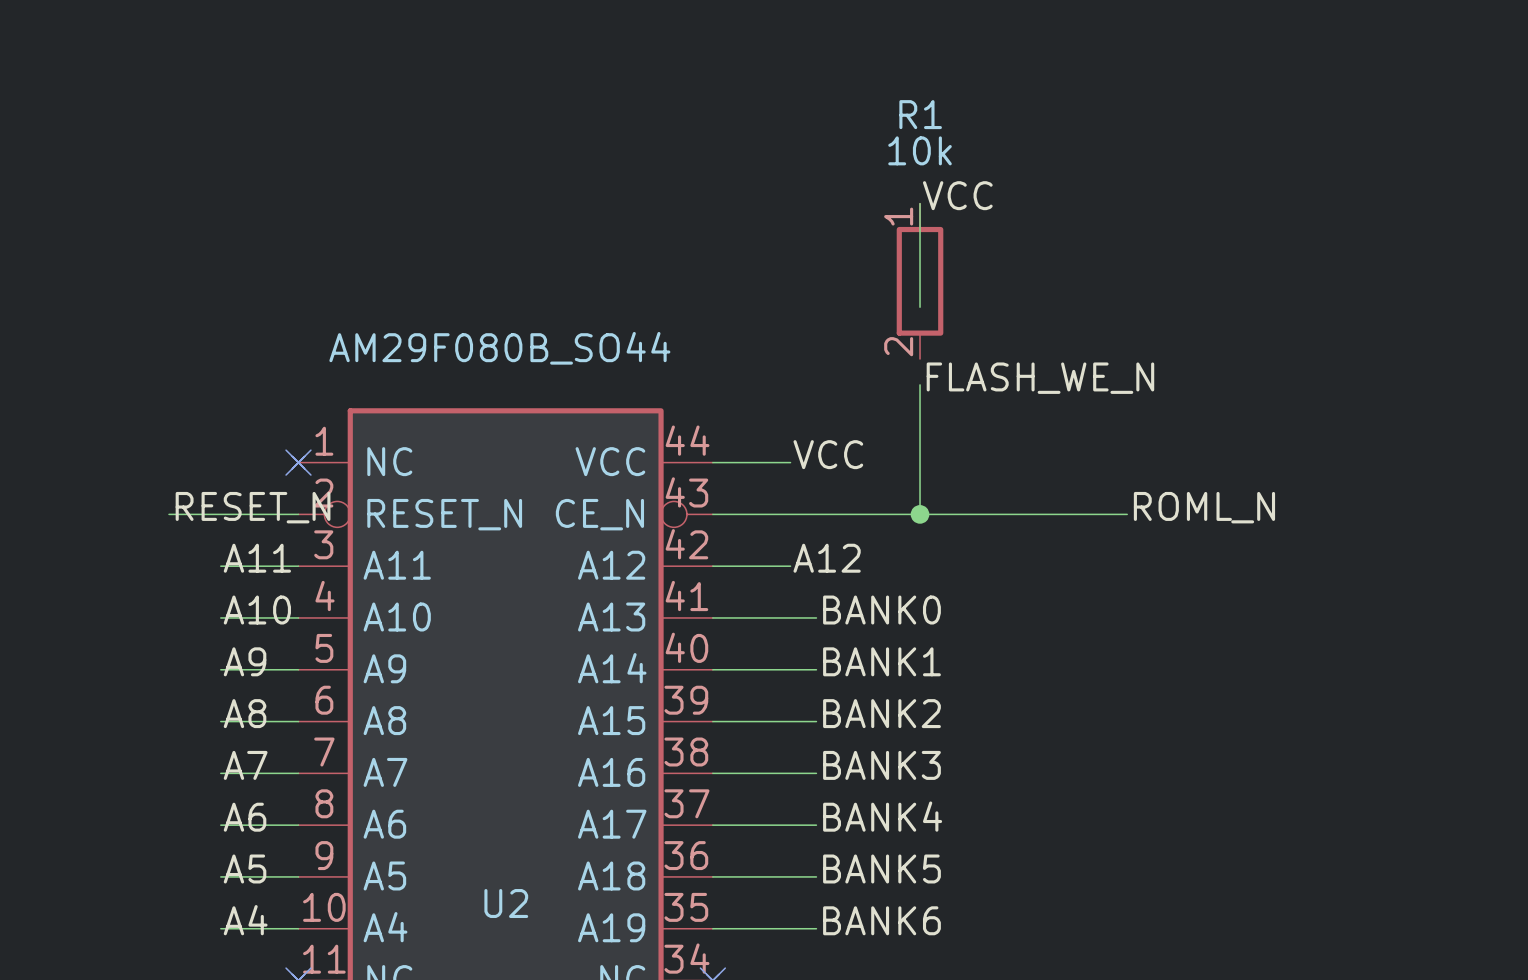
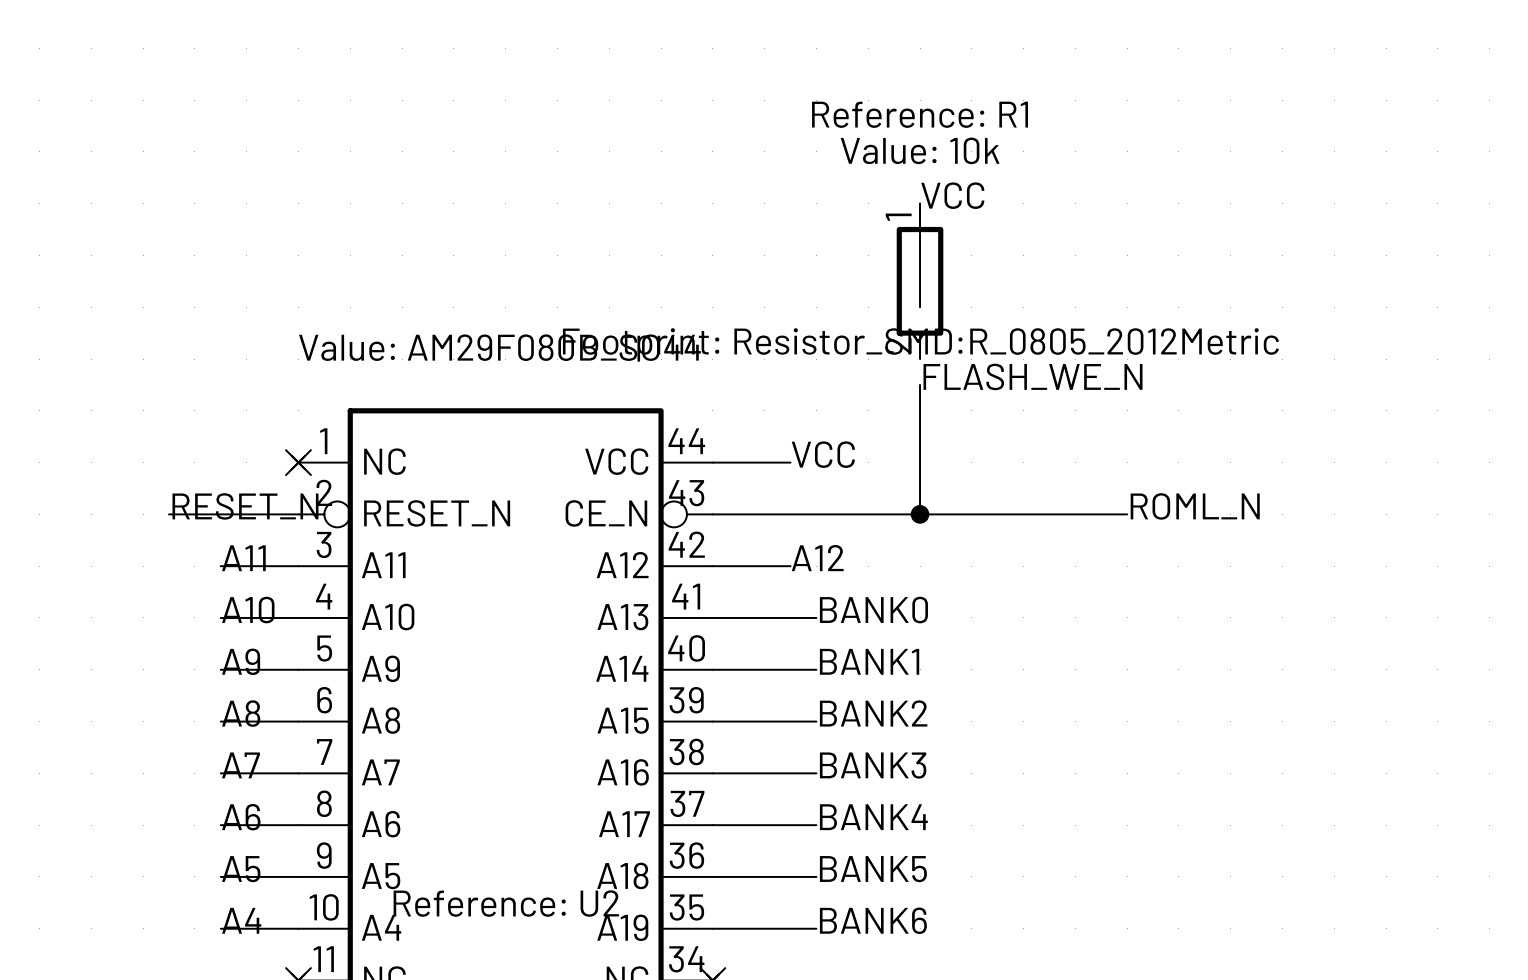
R1 name: R1 (920, 114) -> Reference: R1 (920, 114)
R1 value: 10k (920, 150) -> Value: 10k (920, 150)
R1 text: none -> Footprint: Resistor_SMD:R_0805_2012Metric (920, 344)
U2 value: AM29F080B_SO44 (499, 348) -> Value: AM29F080B_SO44 (500, 347)
U2 name: U2 (506, 903) -> Reference: U2 (506, 903)

